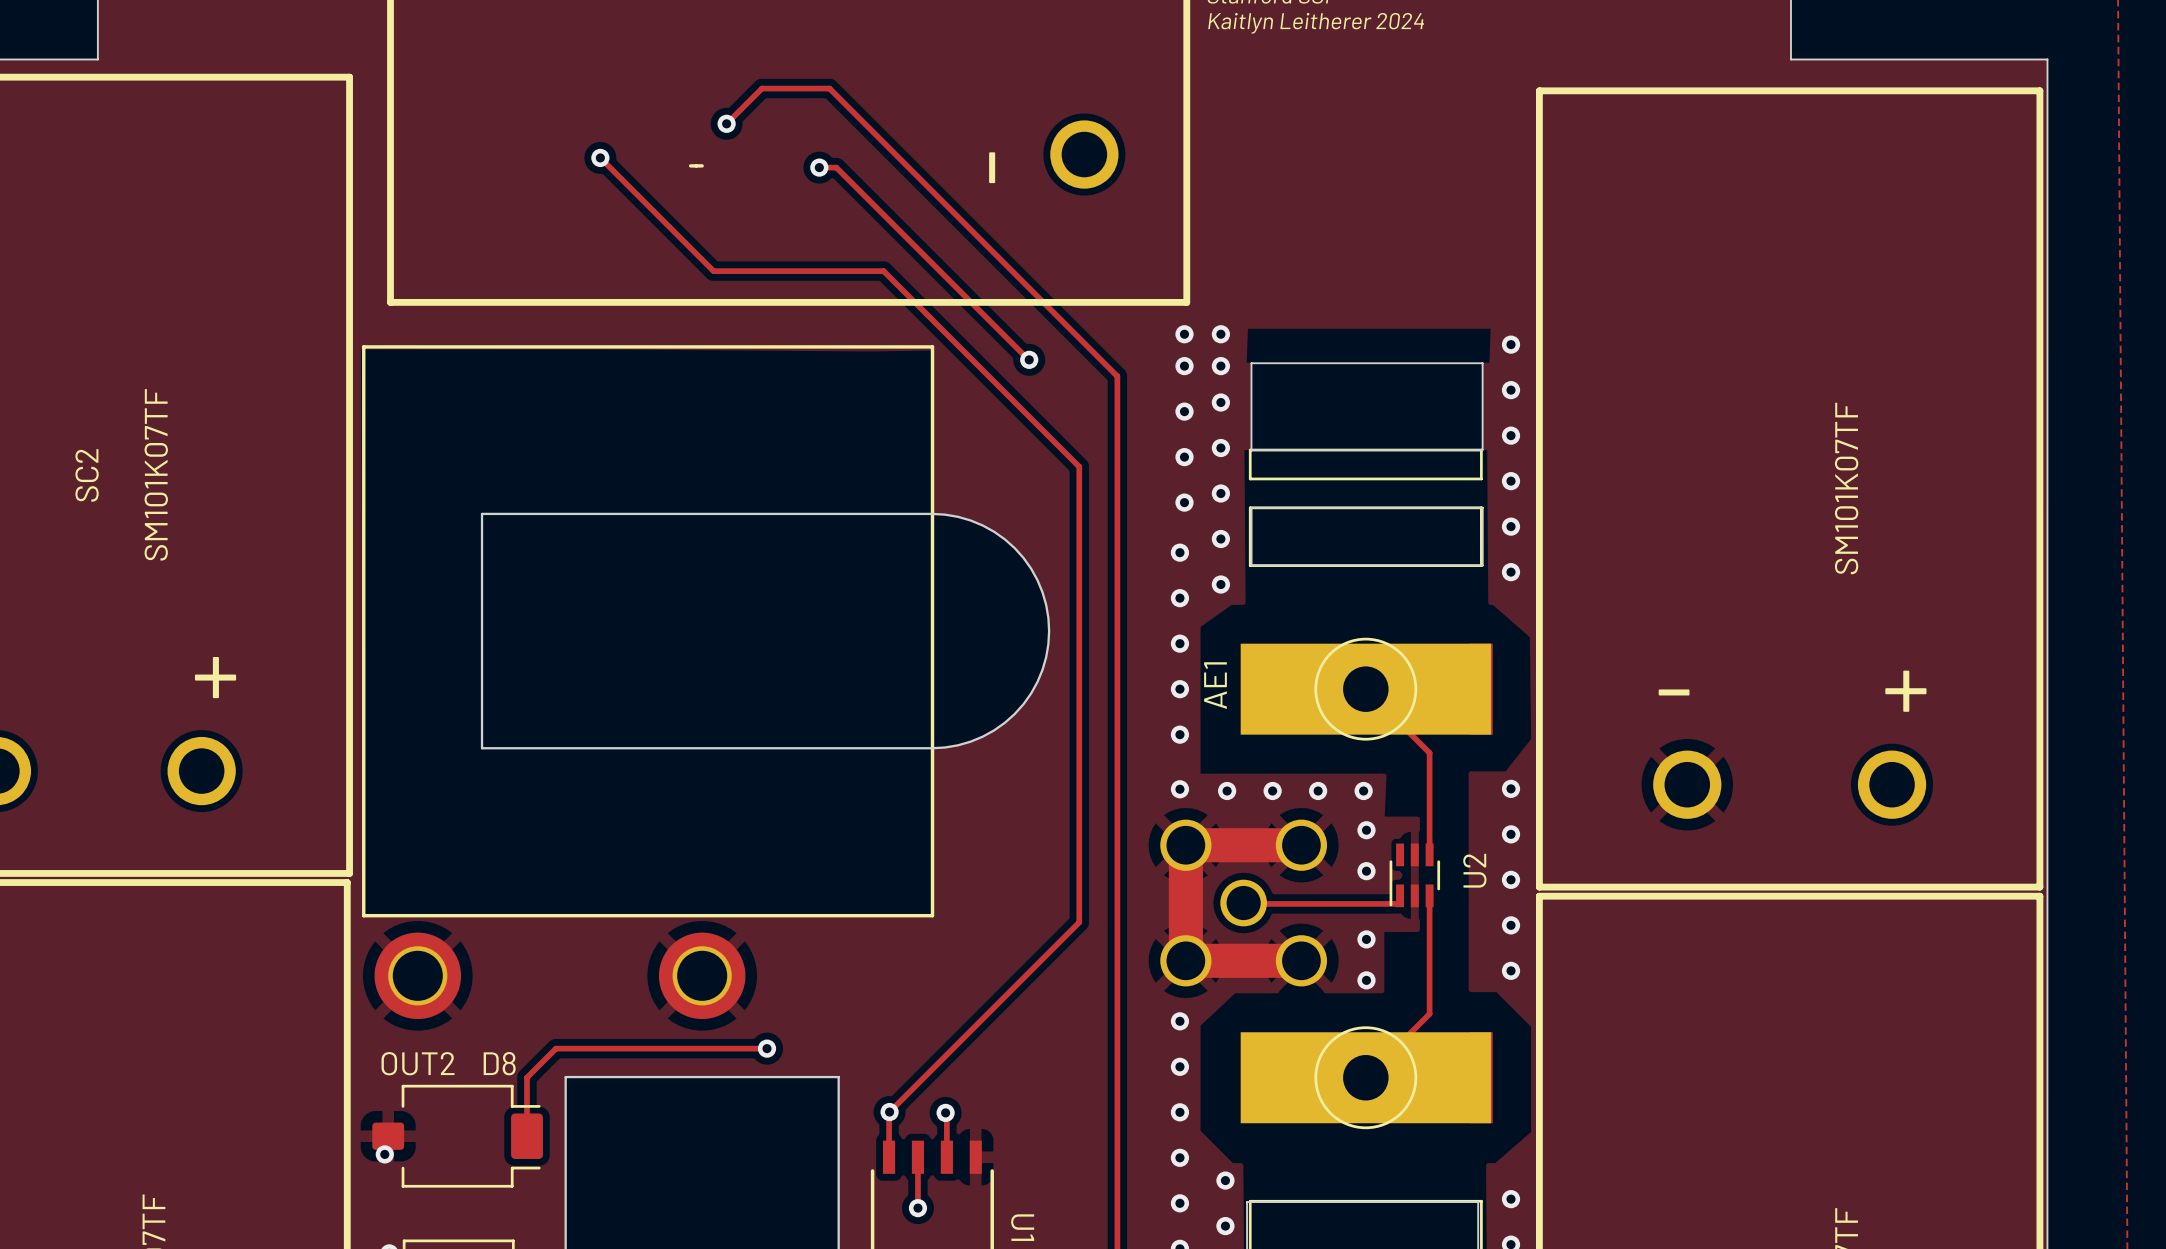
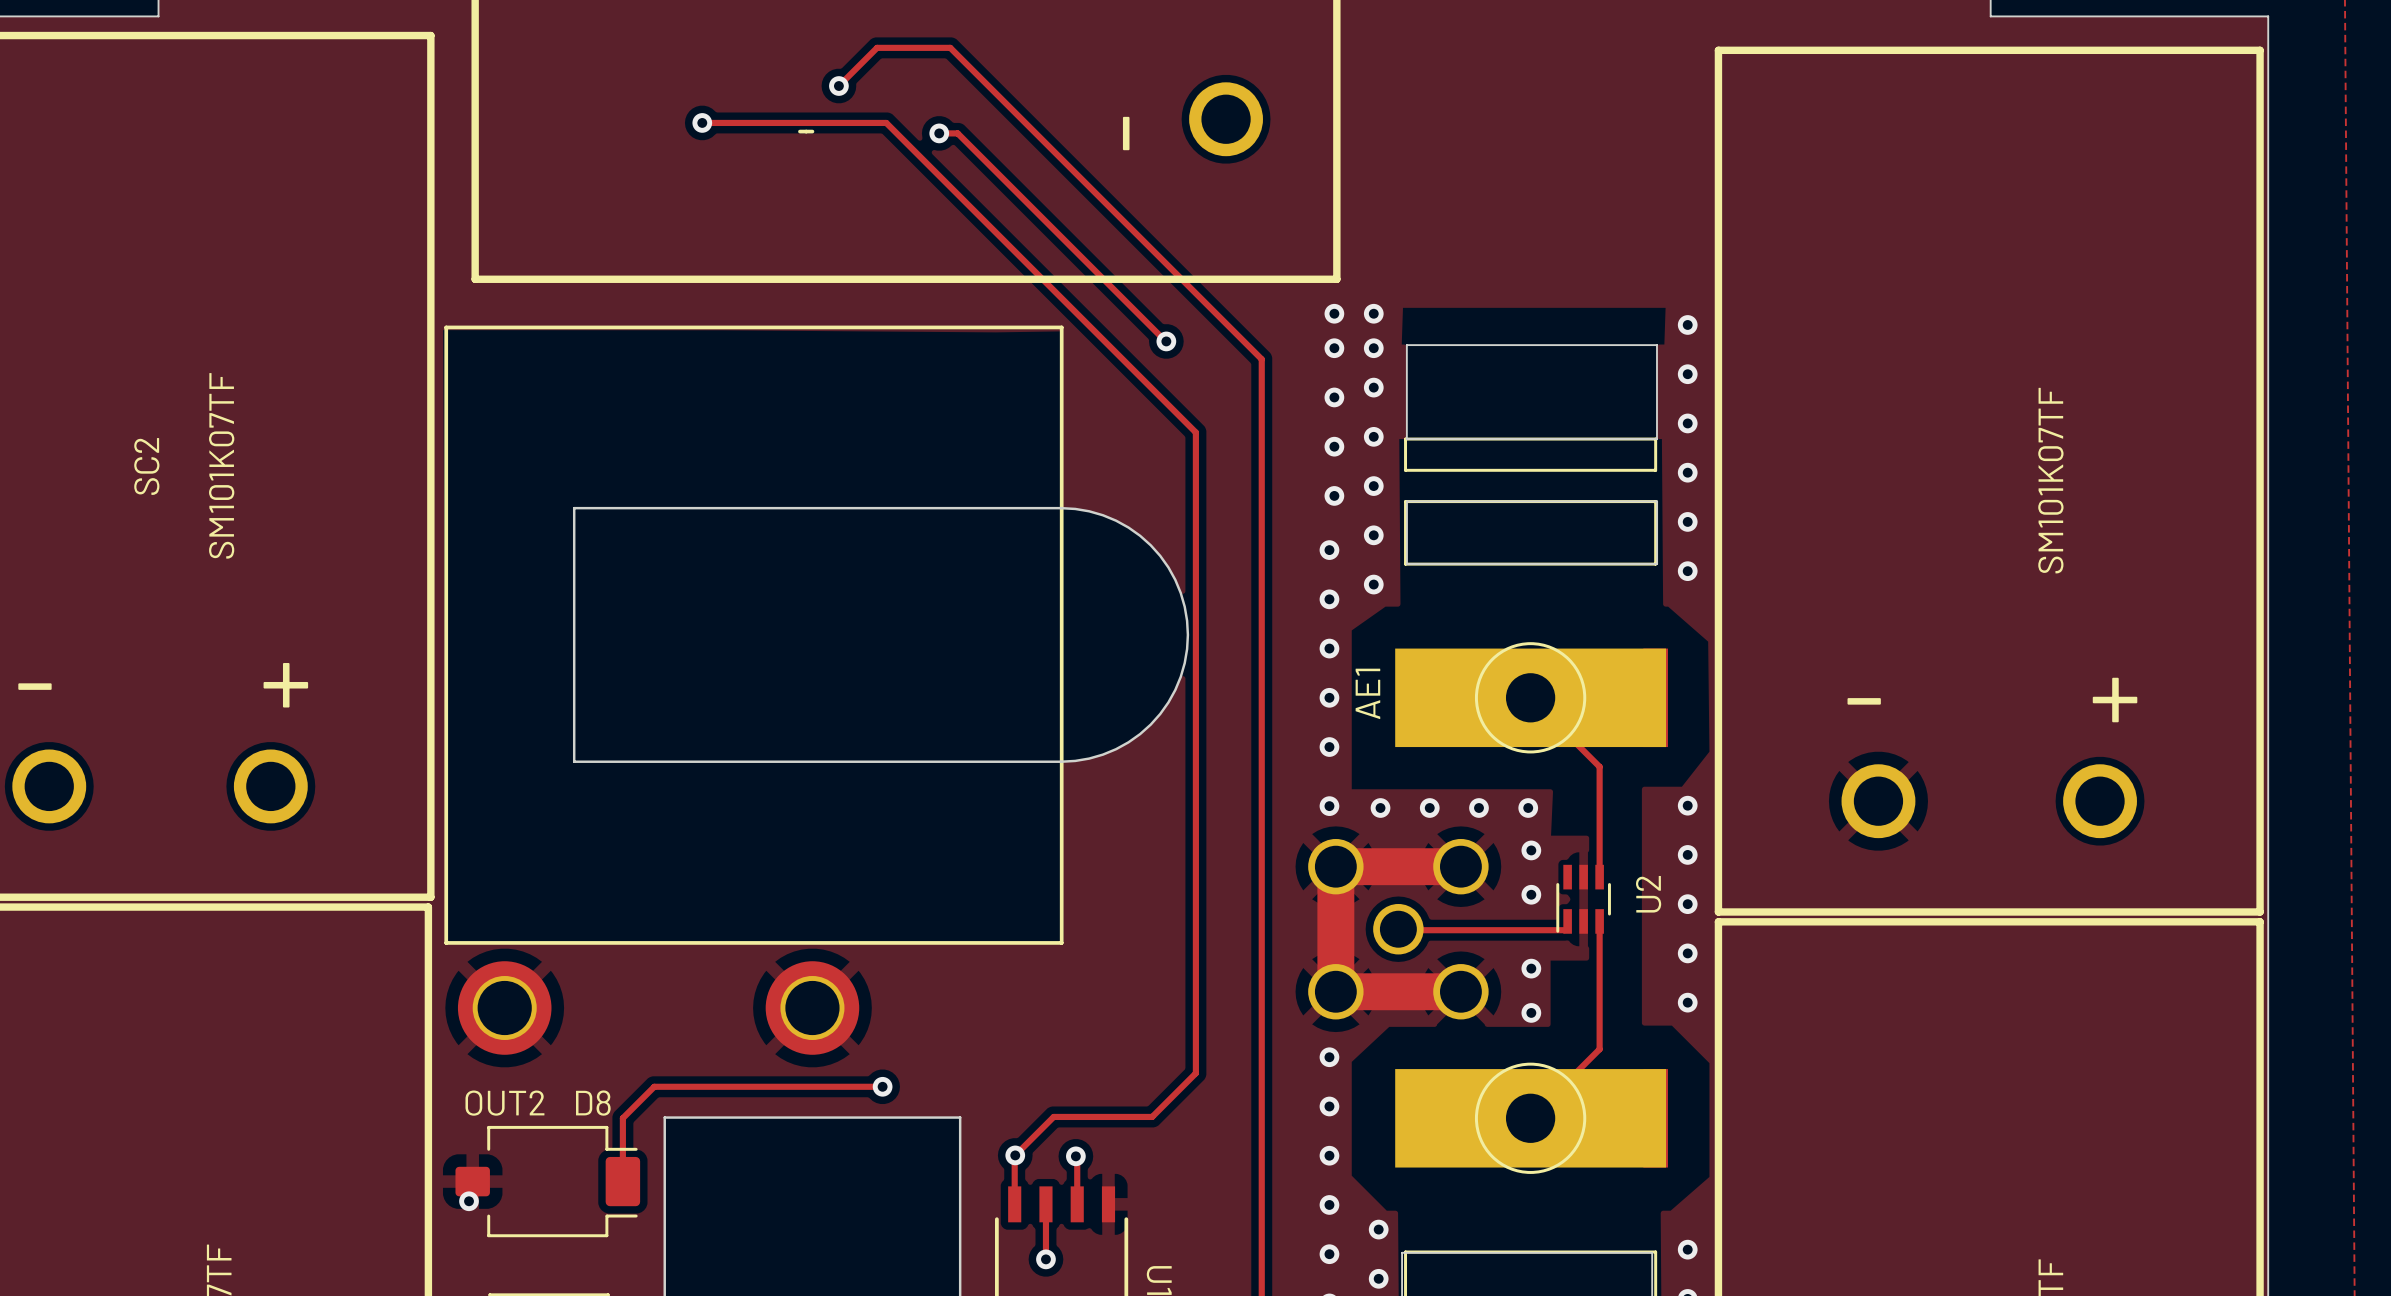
track: (600, 157) (713, 271) (883, 271) -> (702, 122) (886, 122) (1008, 245)
track: (1056, 444) (1079, 466) (1079, 922) (925, 1076) -> (1195, 432) (1195, 1073) (1152, 1116) (1053, 1116)

